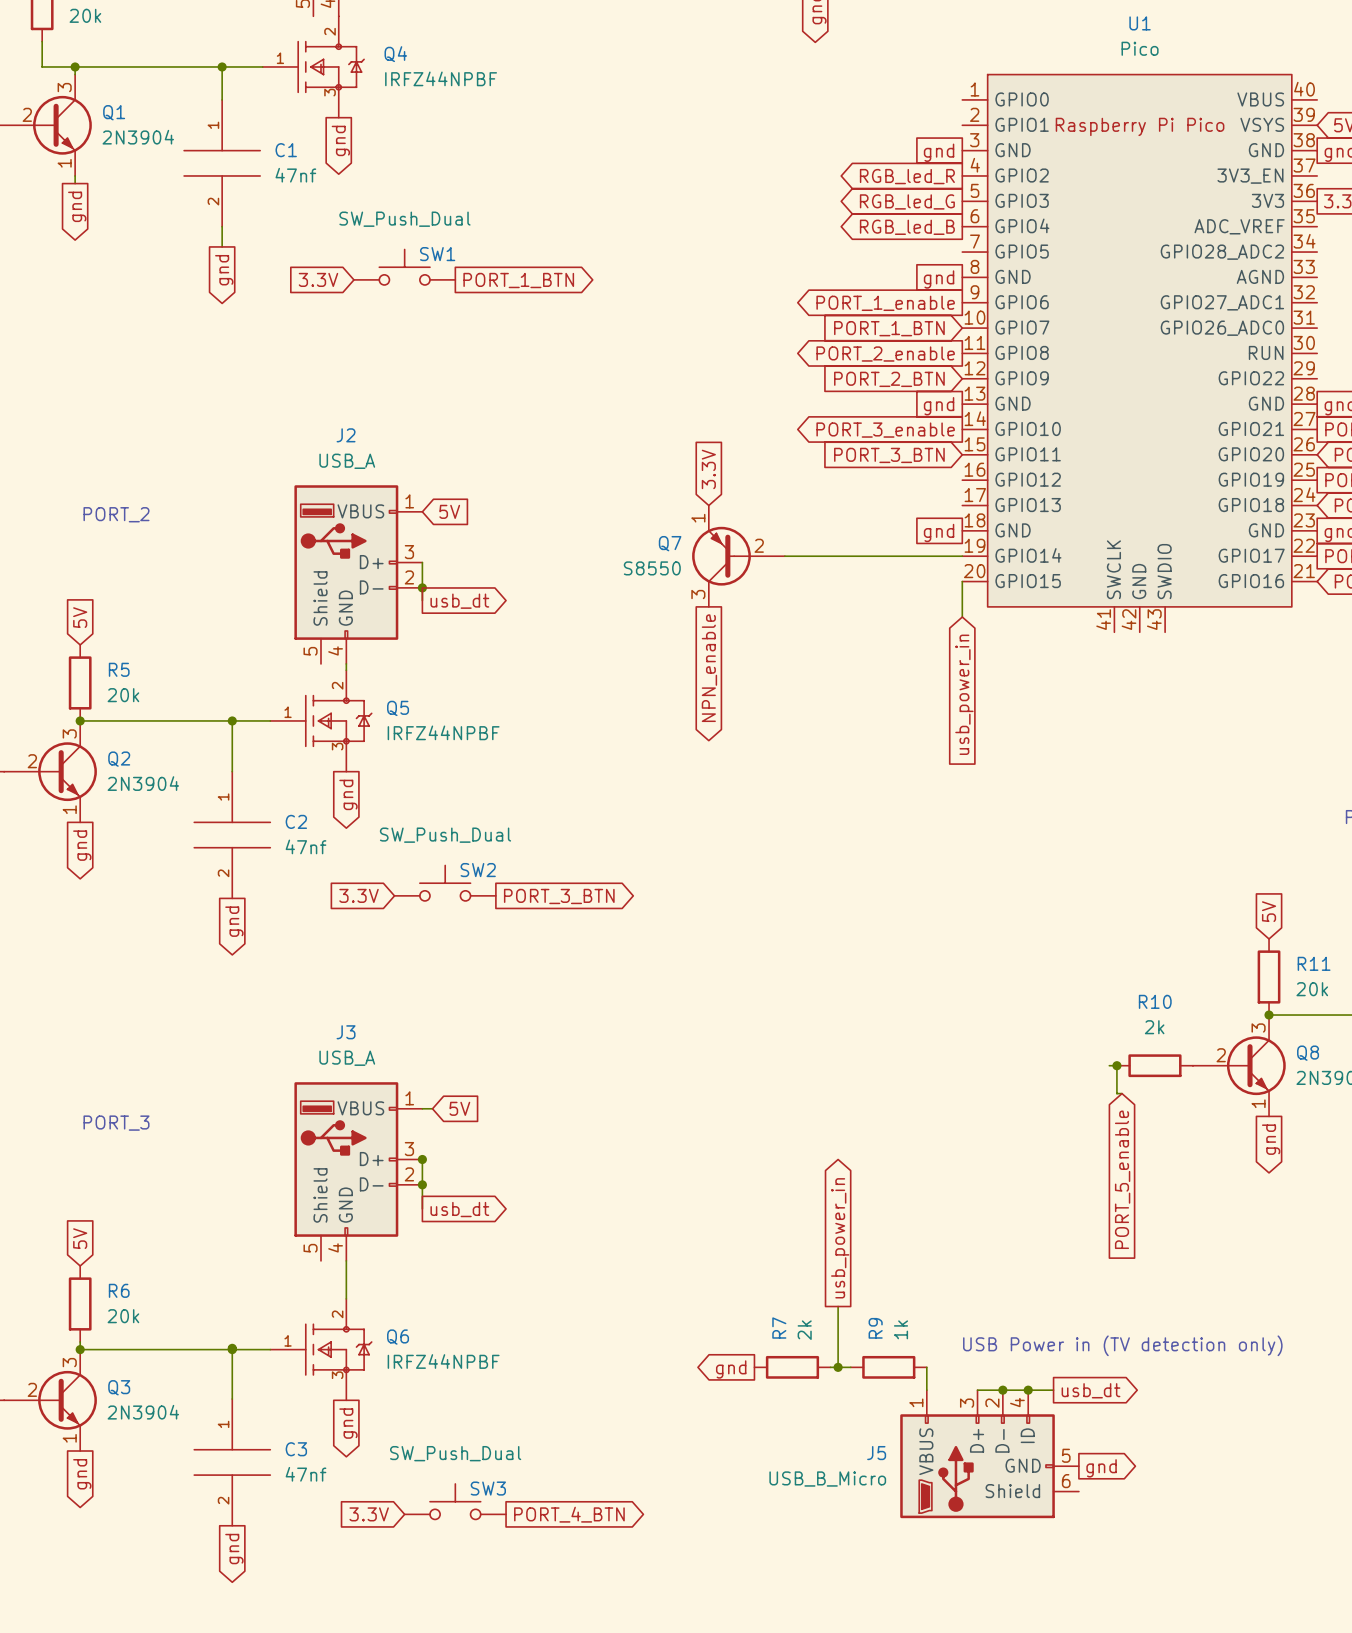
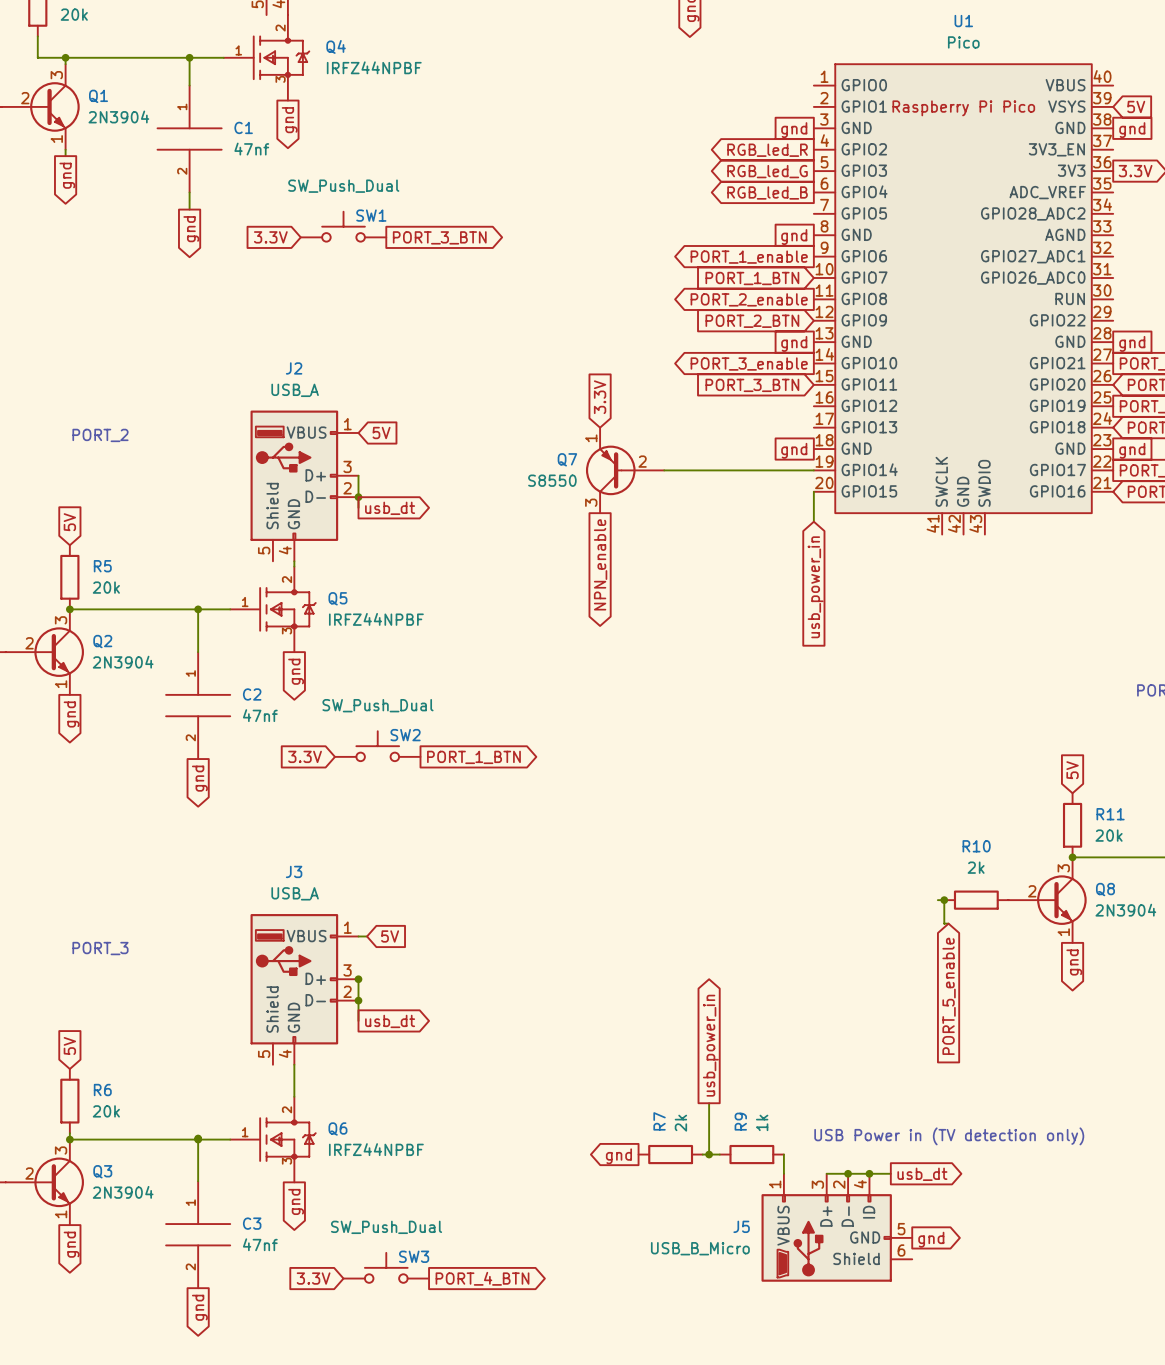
global label: PORT_1_BTN (518, 280) -> PORT_3_BTN (439, 237)
global label: PORT_3_BTN (559, 896) -> PORT_1_BTN (473, 757)

